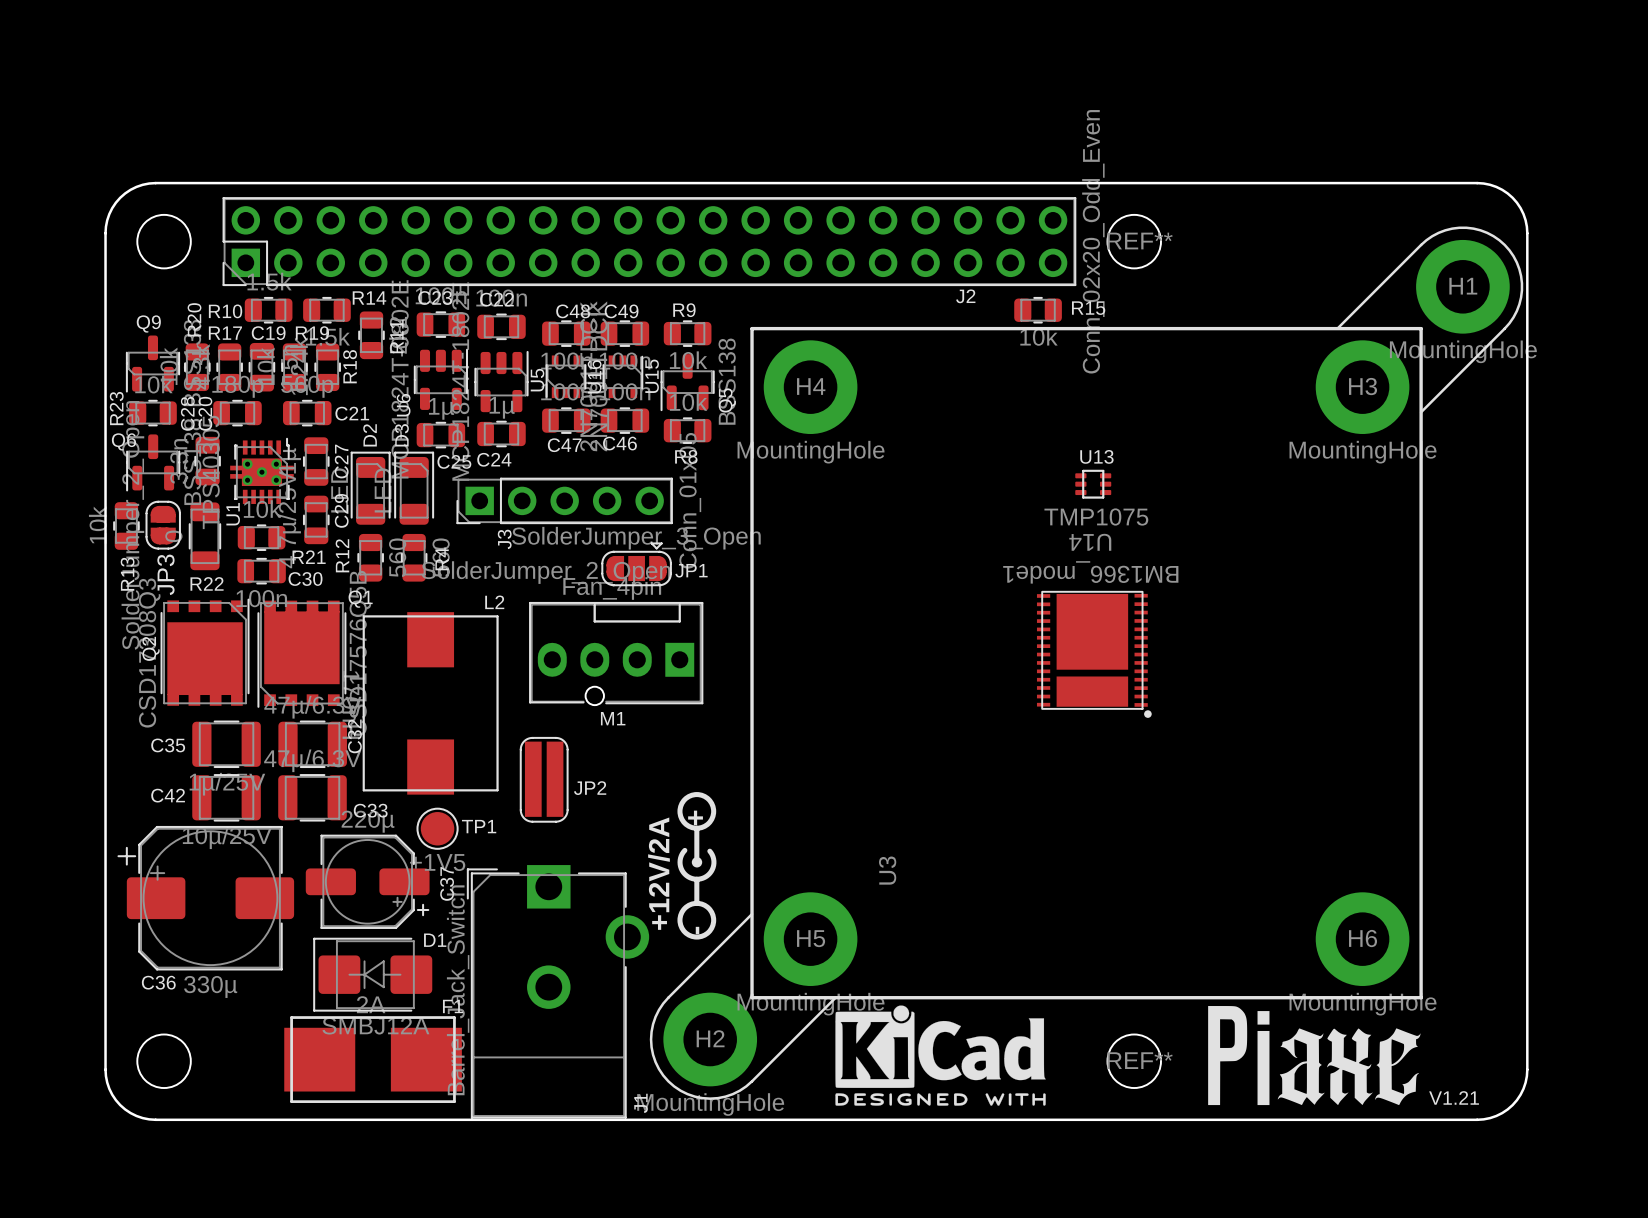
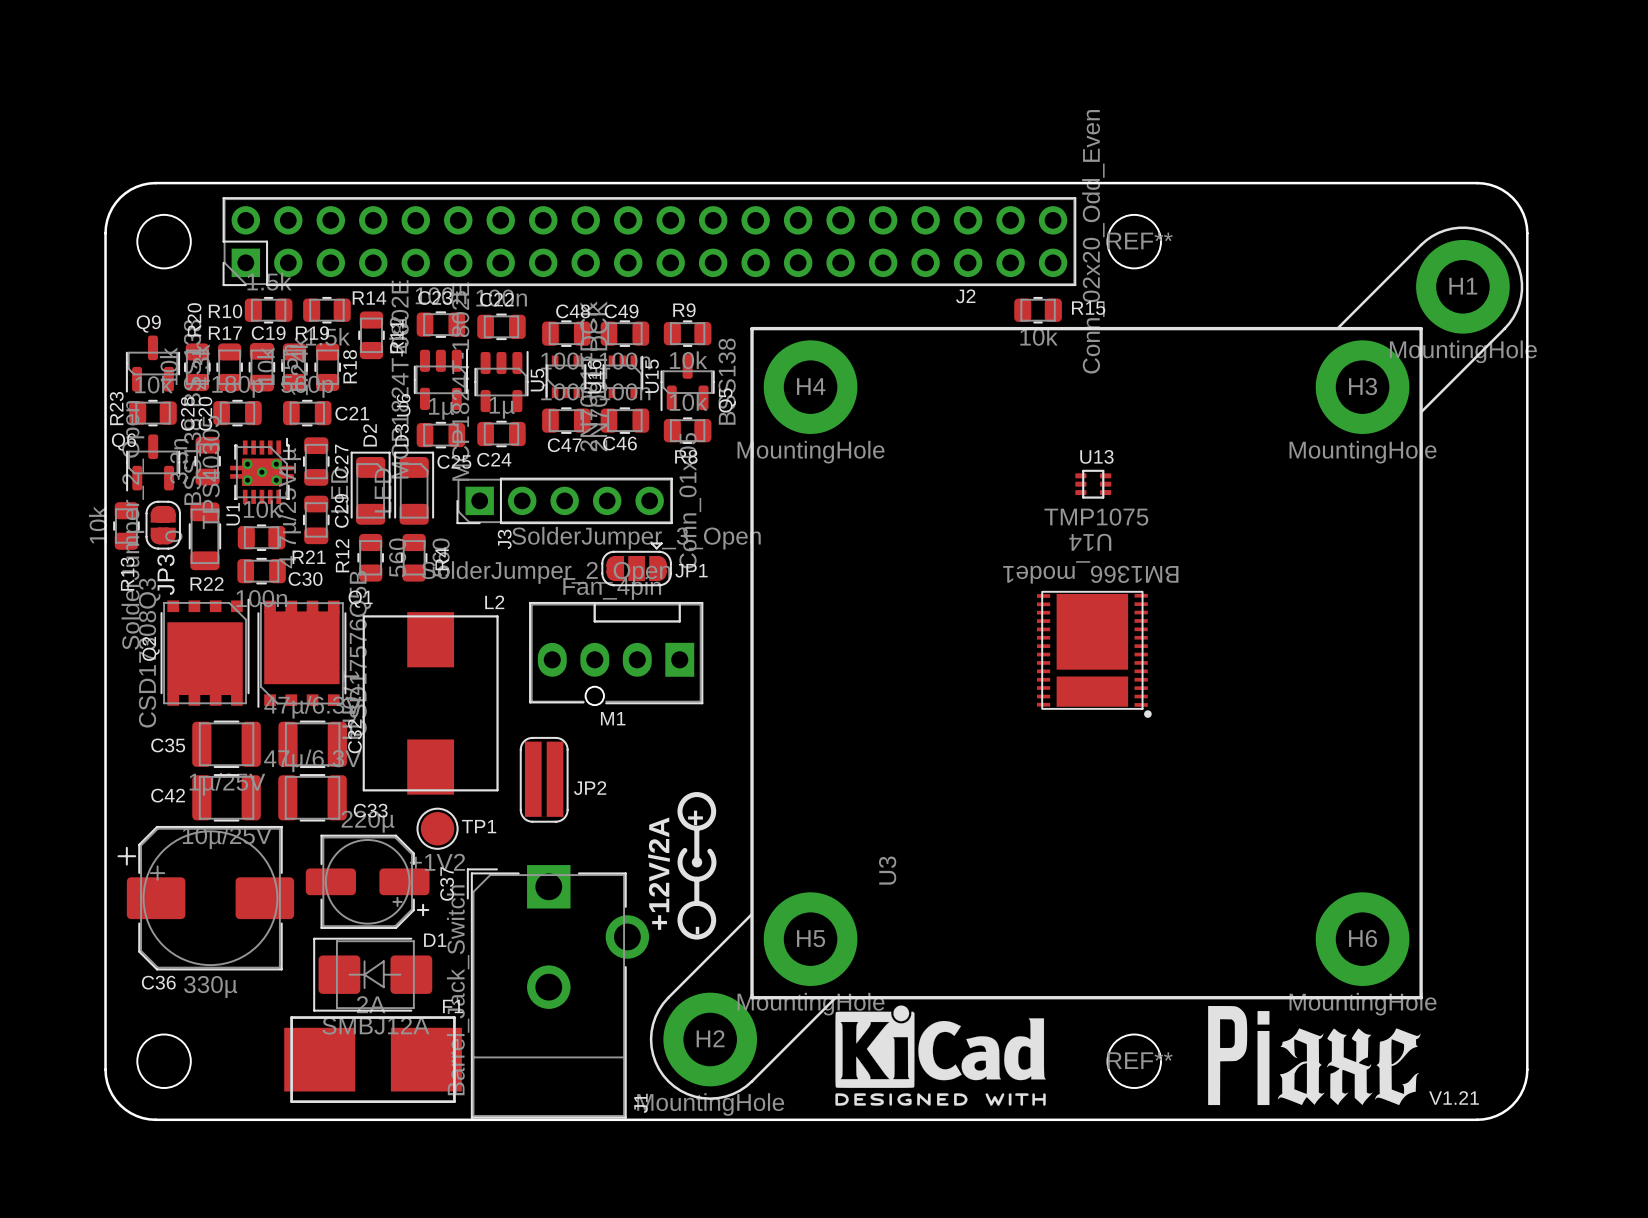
TP1 value: +1V5 (437, 862) -> +1V2 (437, 862)

